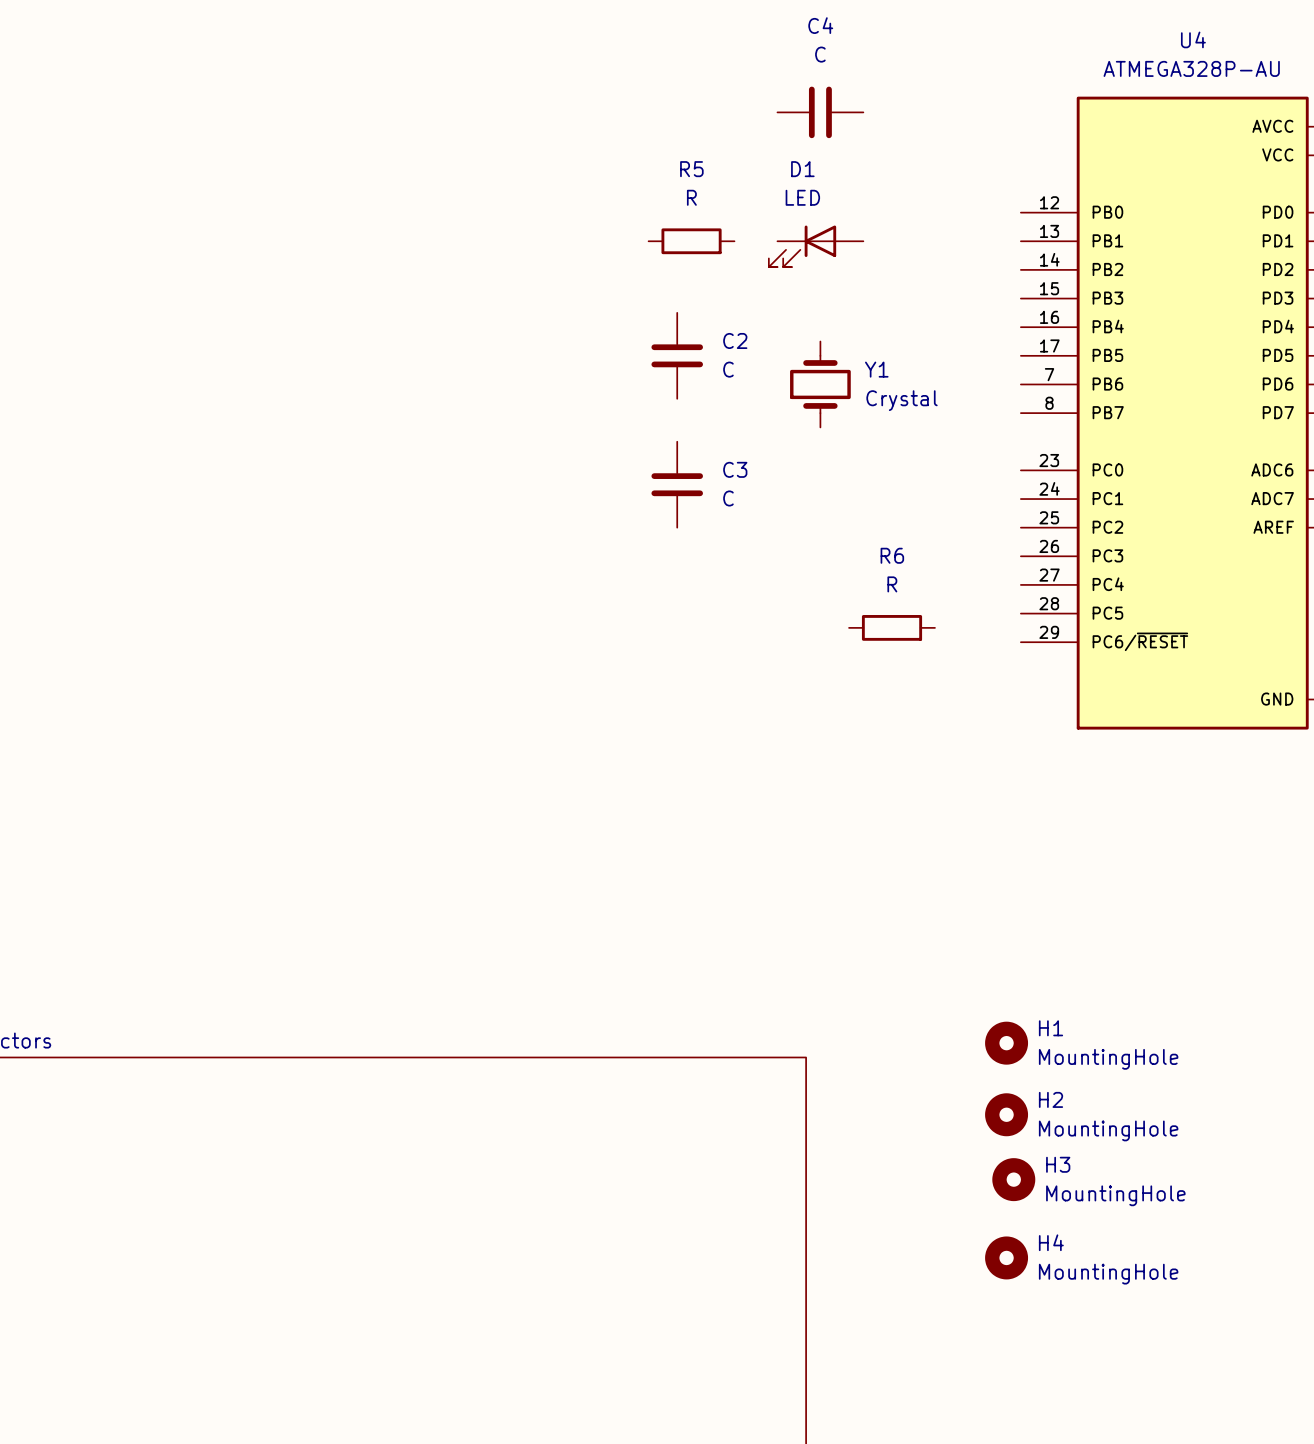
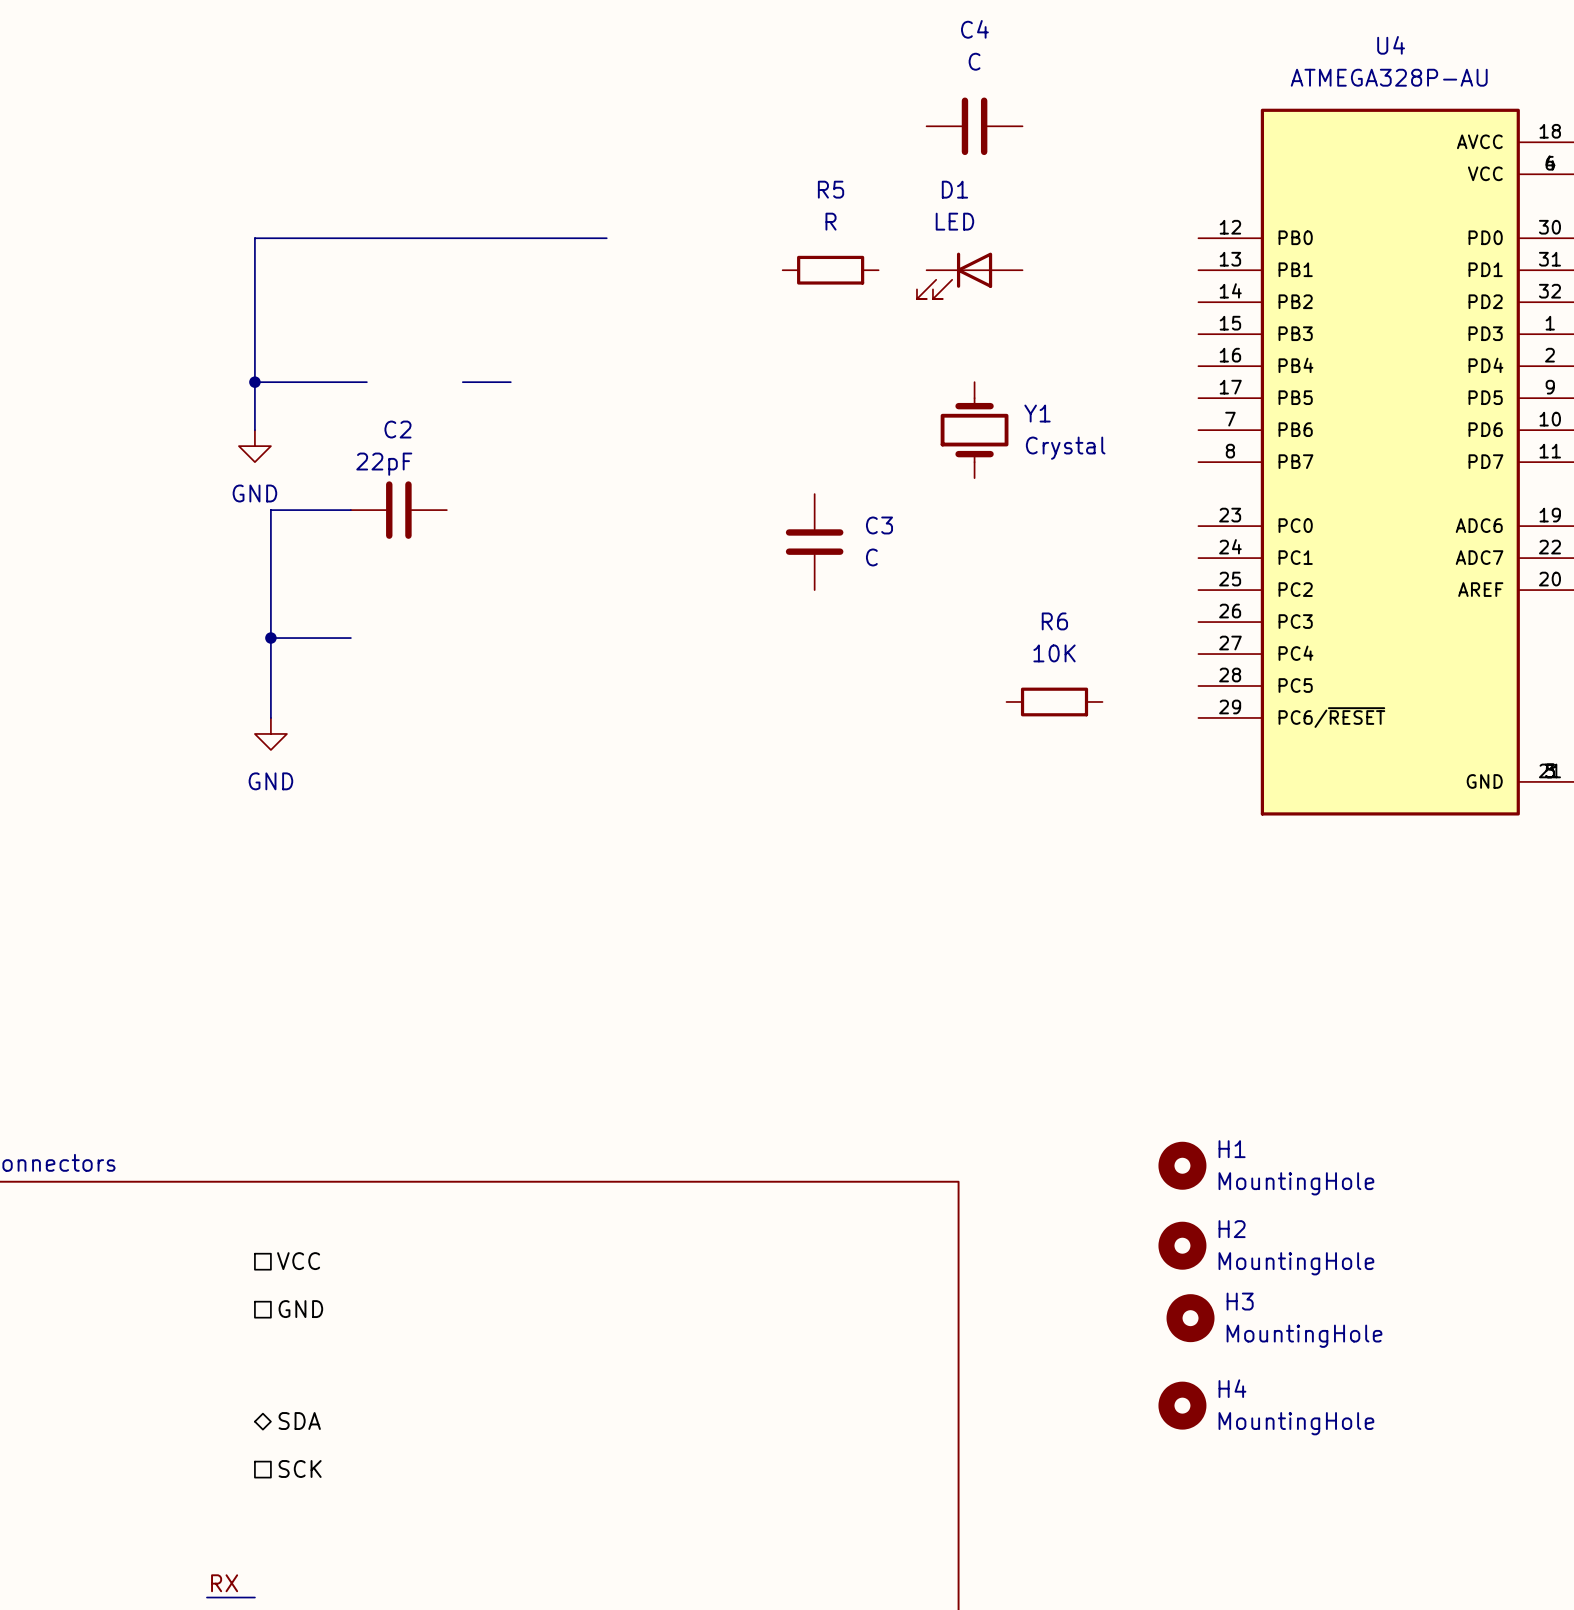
wire: none -> (606, 238) (254, 238) (254, 430)
C2 name position: C2 (735, 340) -> C2 (397, 429)
wire: none -> (254, 382) (366, 382)
junction: none -> (254, 382)
wire: none -> (462, 382) (510, 382)
C2 rotation: 0° (677, 355) -> 90° clockwise (398, 510)
C2 position: (677, 355) -> (398, 510)
C2 value: C (728, 369) -> 22pF (384, 464)
power symbol: none -> GND (254, 446)
wire: none -> (350, 510) (270, 510) (270, 717)
wire: none -> (270, 638) (350, 638)
junction: none -> (270, 638)
R6 value: R (892, 584) -> 10K (1054, 653)
power symbol: none -> GND (270, 733)
sheet pin: none -> VCC (298, 1261)
sheet pin: none -> GND (300, 1309)
sheet pin: none -> SDA (299, 1421)
sheet pin: none -> SCK (300, 1468)
label: none -> RX (224, 1583)
wire: none -> (206, 1597) (254, 1597)

